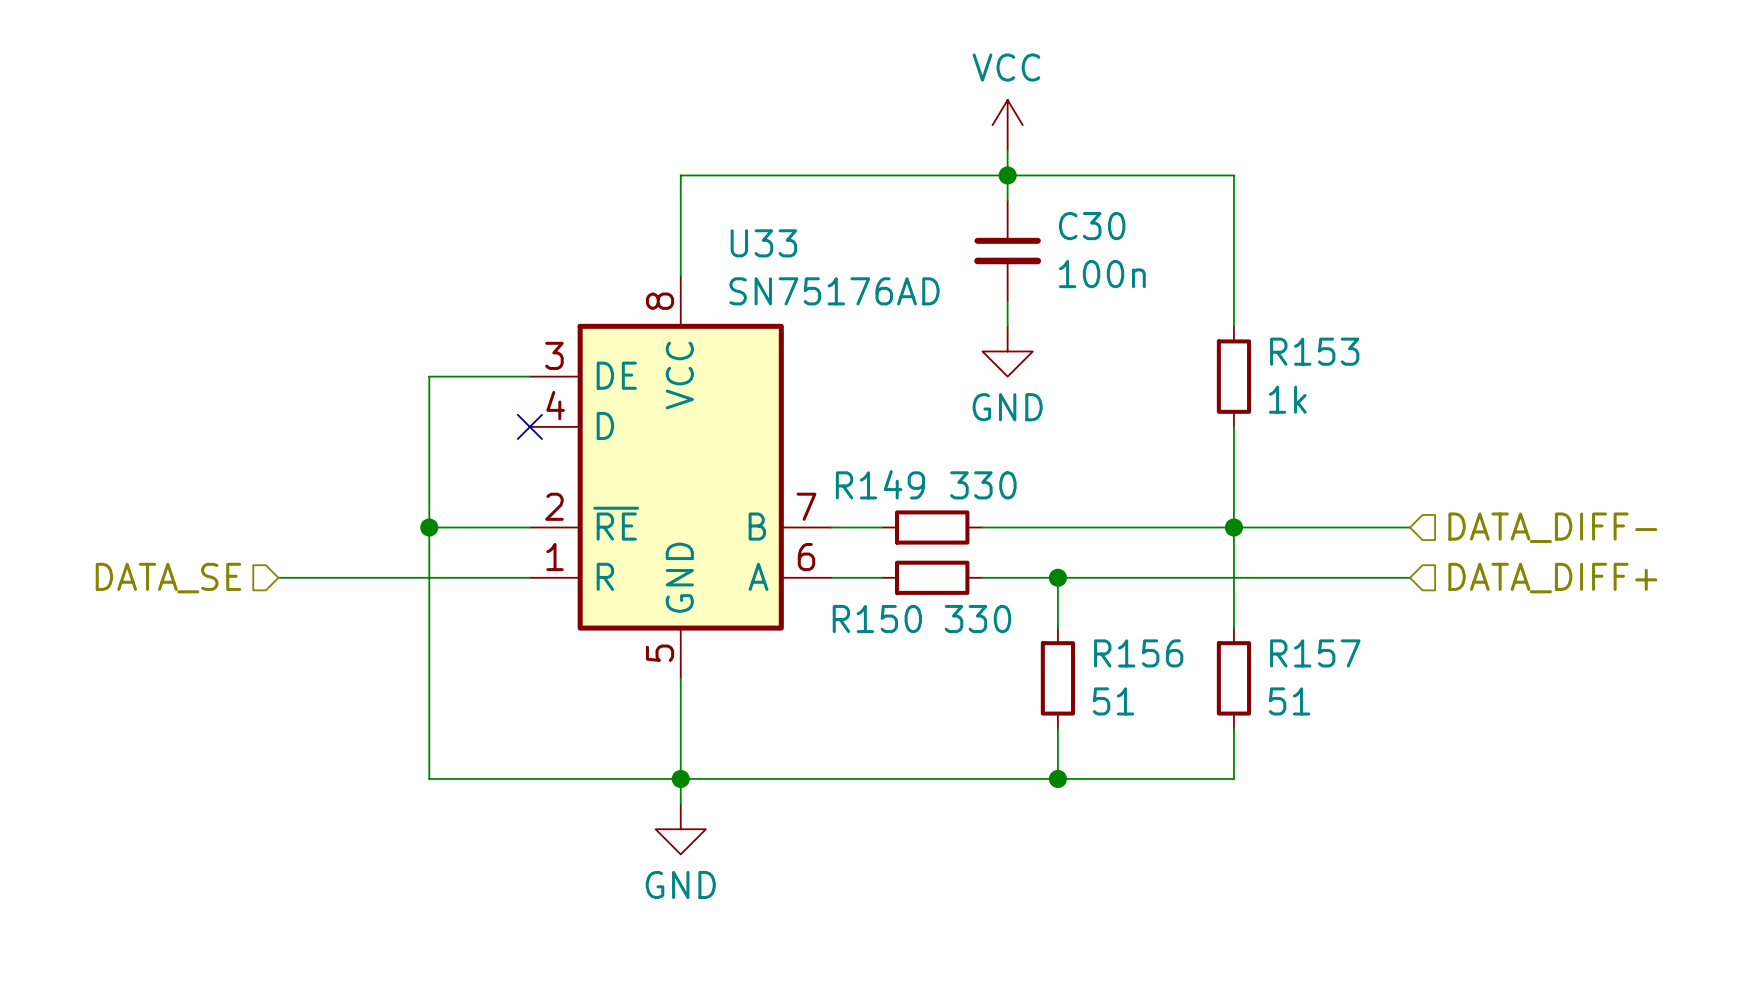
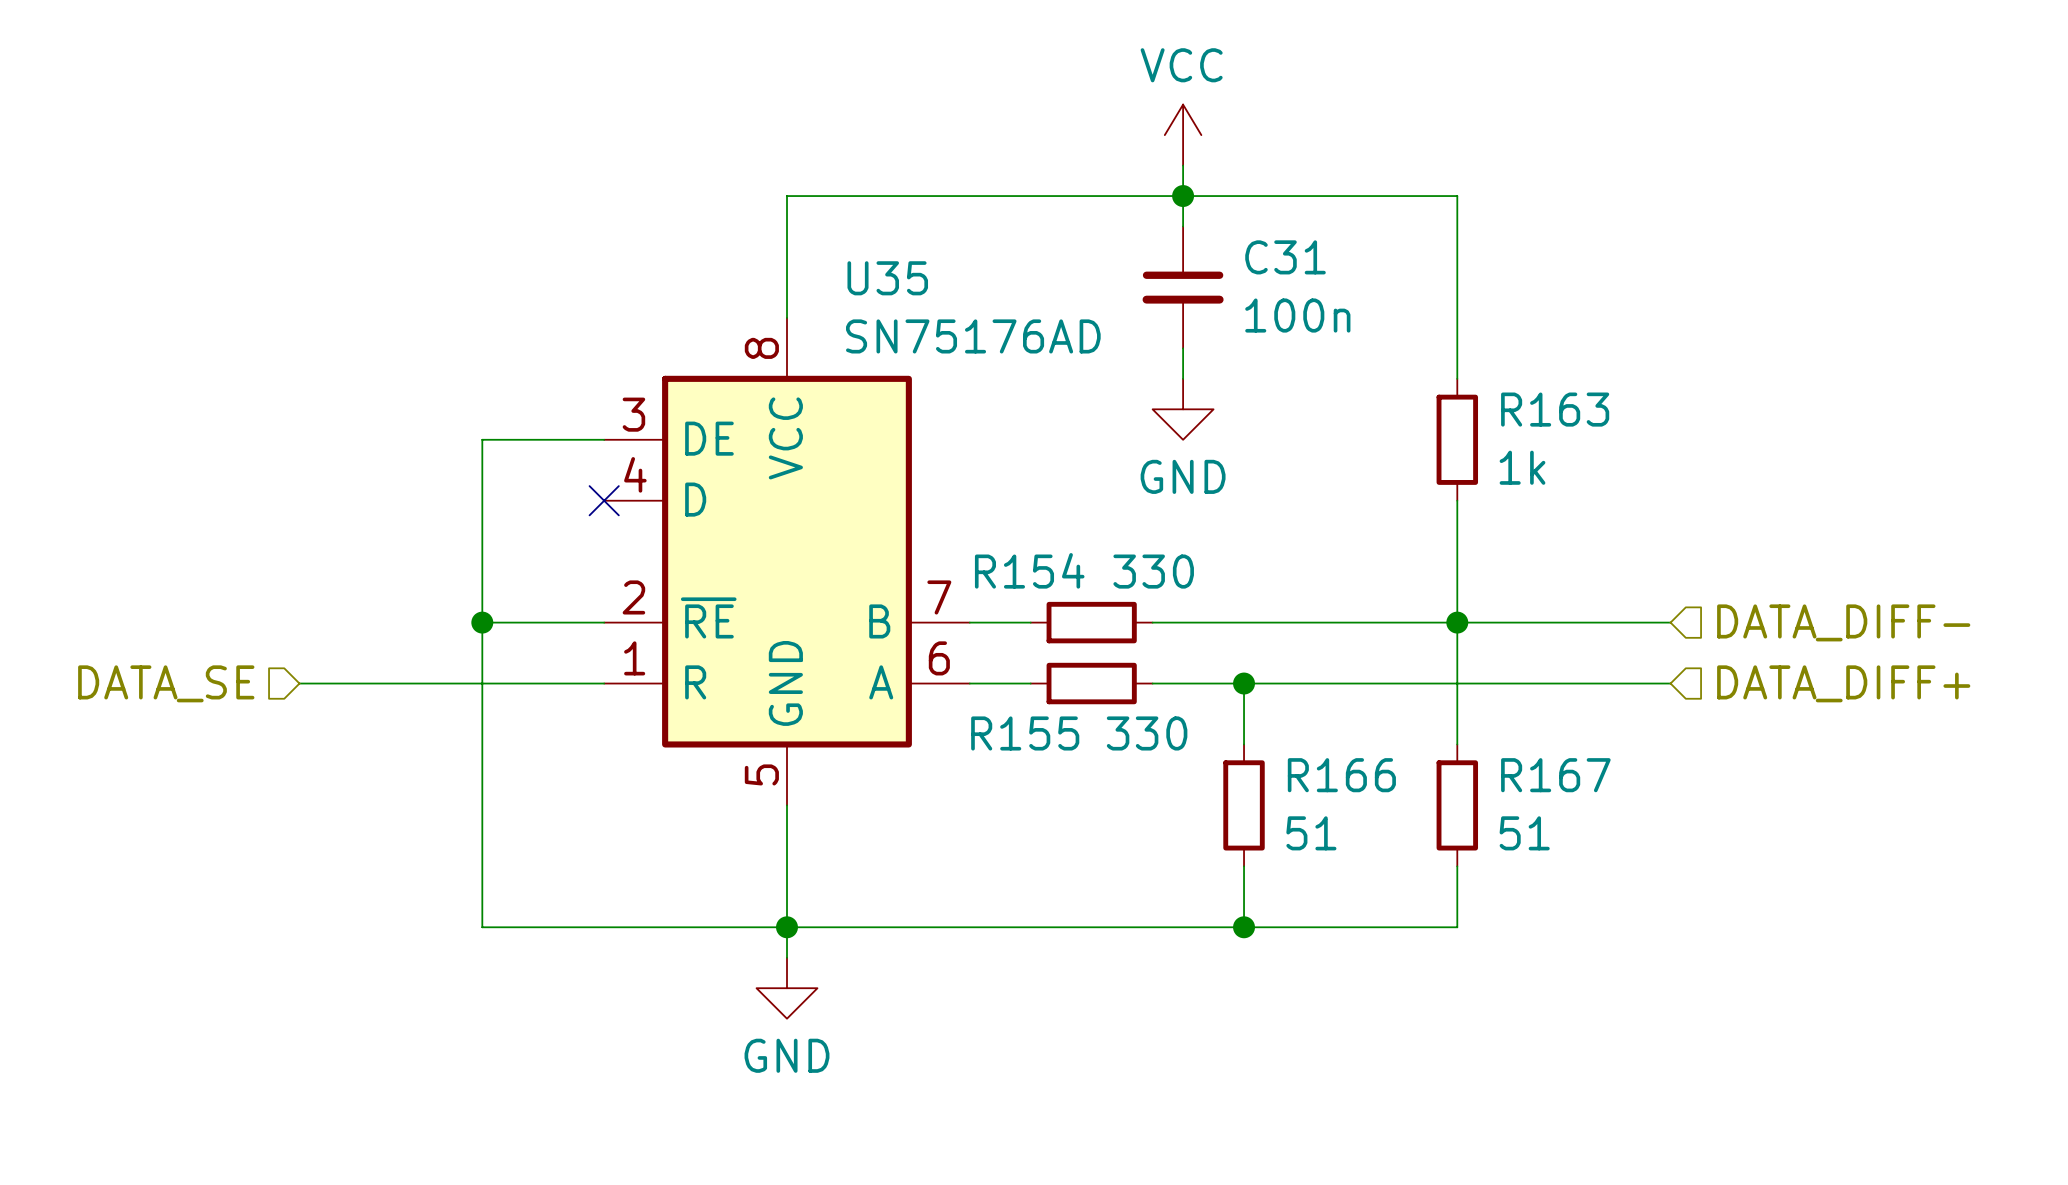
C30 name: C30 (1092, 226) -> C31 (1285, 257)
U33 name: U33 (763, 243) -> U35 (887, 278)
R153 name: R153 (1314, 351) -> R163 (1555, 409)
R149 name: R149 (880, 484) -> R154 (1029, 570)
R150 name: R150 (877, 619) -> R155 (1025, 733)
R156 name: R156 (1138, 653) -> R166 (1341, 775)
R157 name: R157 (1315, 653) -> R167 (1555, 775)

